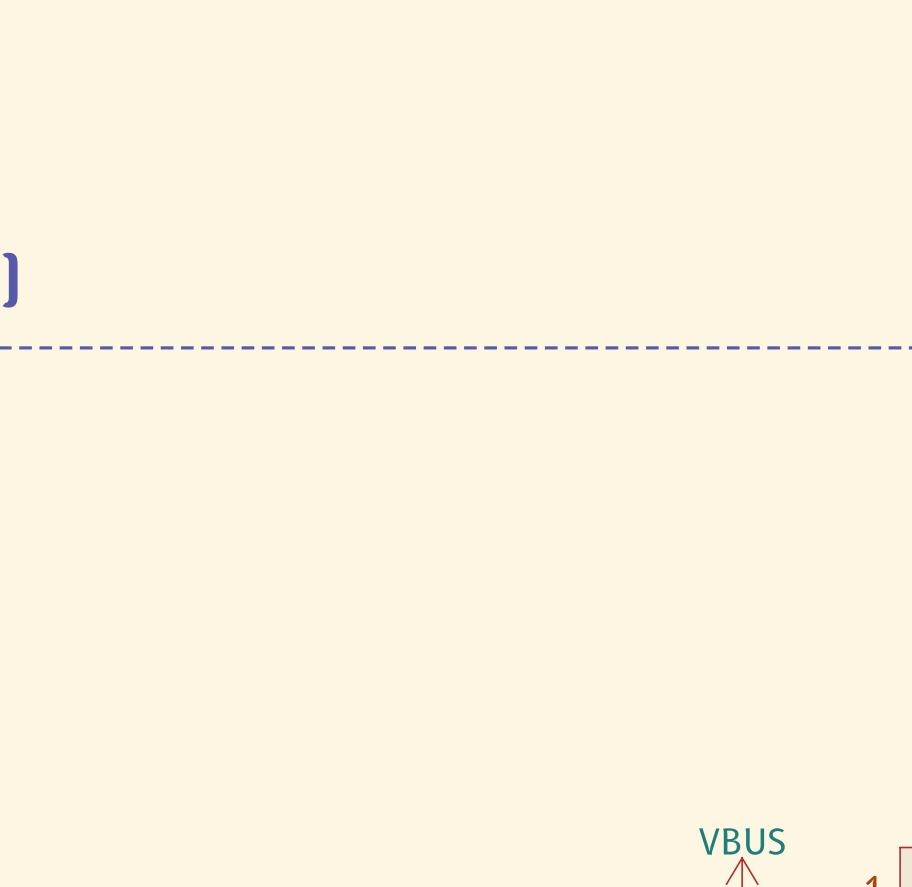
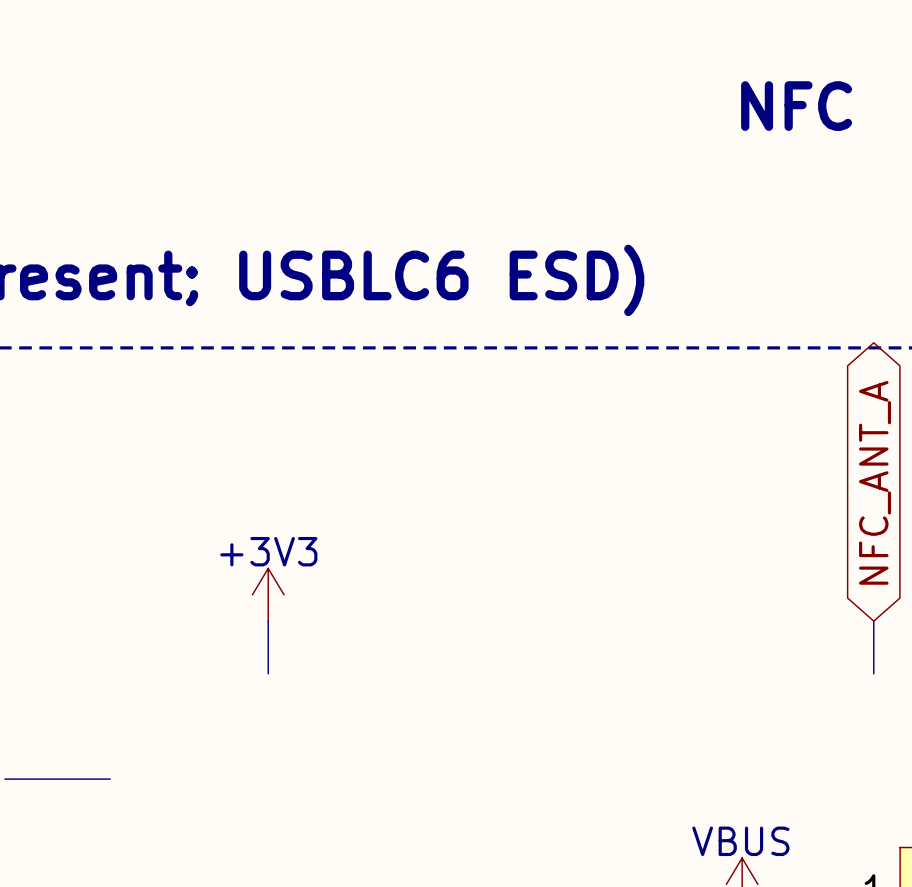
text: none -> NFC (796, 106)
global label: none -> NFC_ANT_A (875, 482)
power symbol: none -> +3V3 (268, 594)
wire: none -> (268, 621) (268, 673)
wire: none -> (873, 621) (873, 673)
wire: none -> (4, 779) (110, 779)

